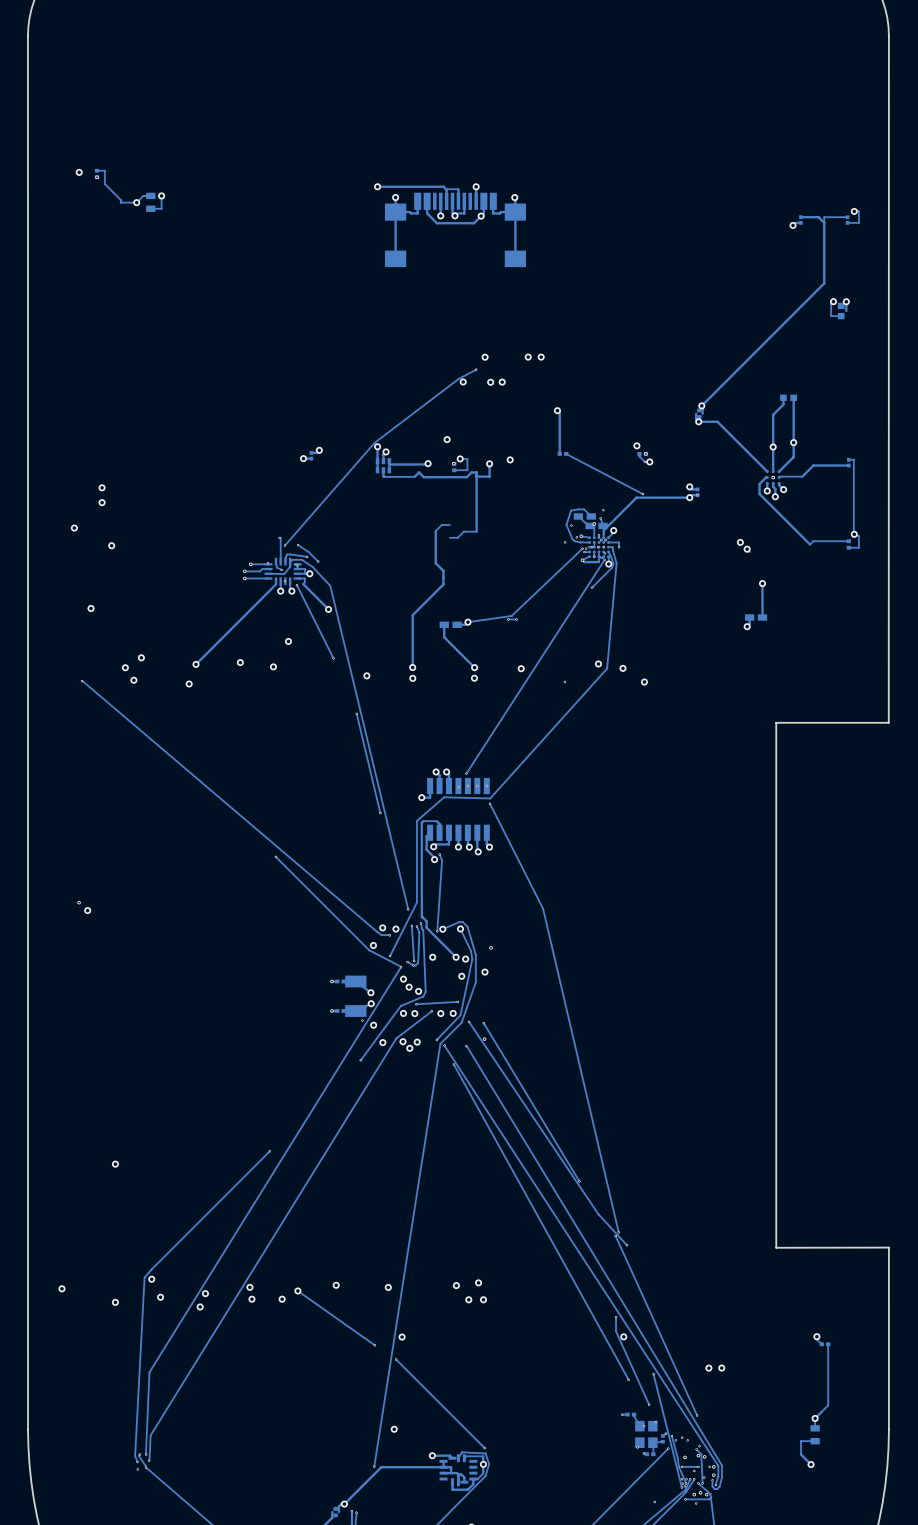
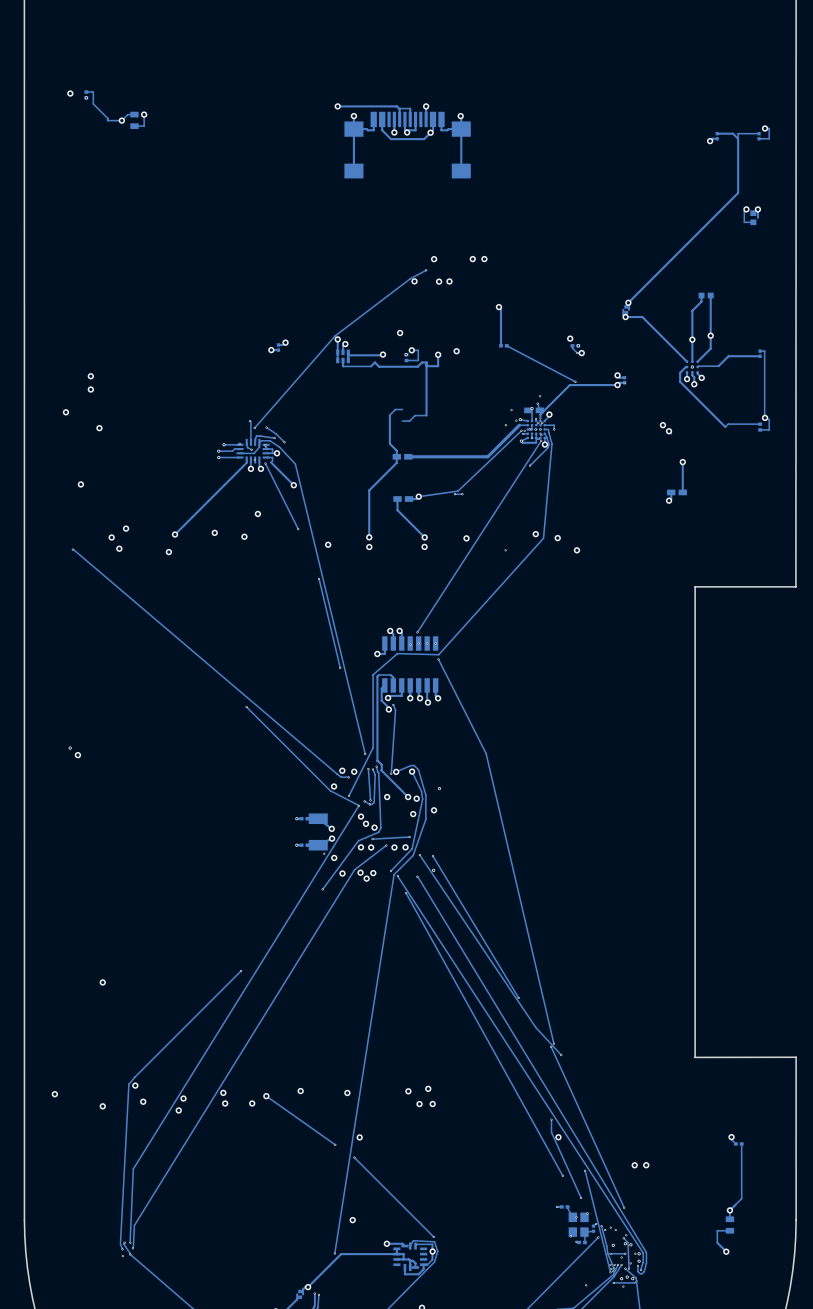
track: (578, 516) (590, 525) -> none
part position: (584, 516) -> (402, 456)
track: (591, 516) (584, 509) (571, 510) (566, 524) (572, 538) (580, 542) -> (408, 456) (487, 456) (519, 425)

